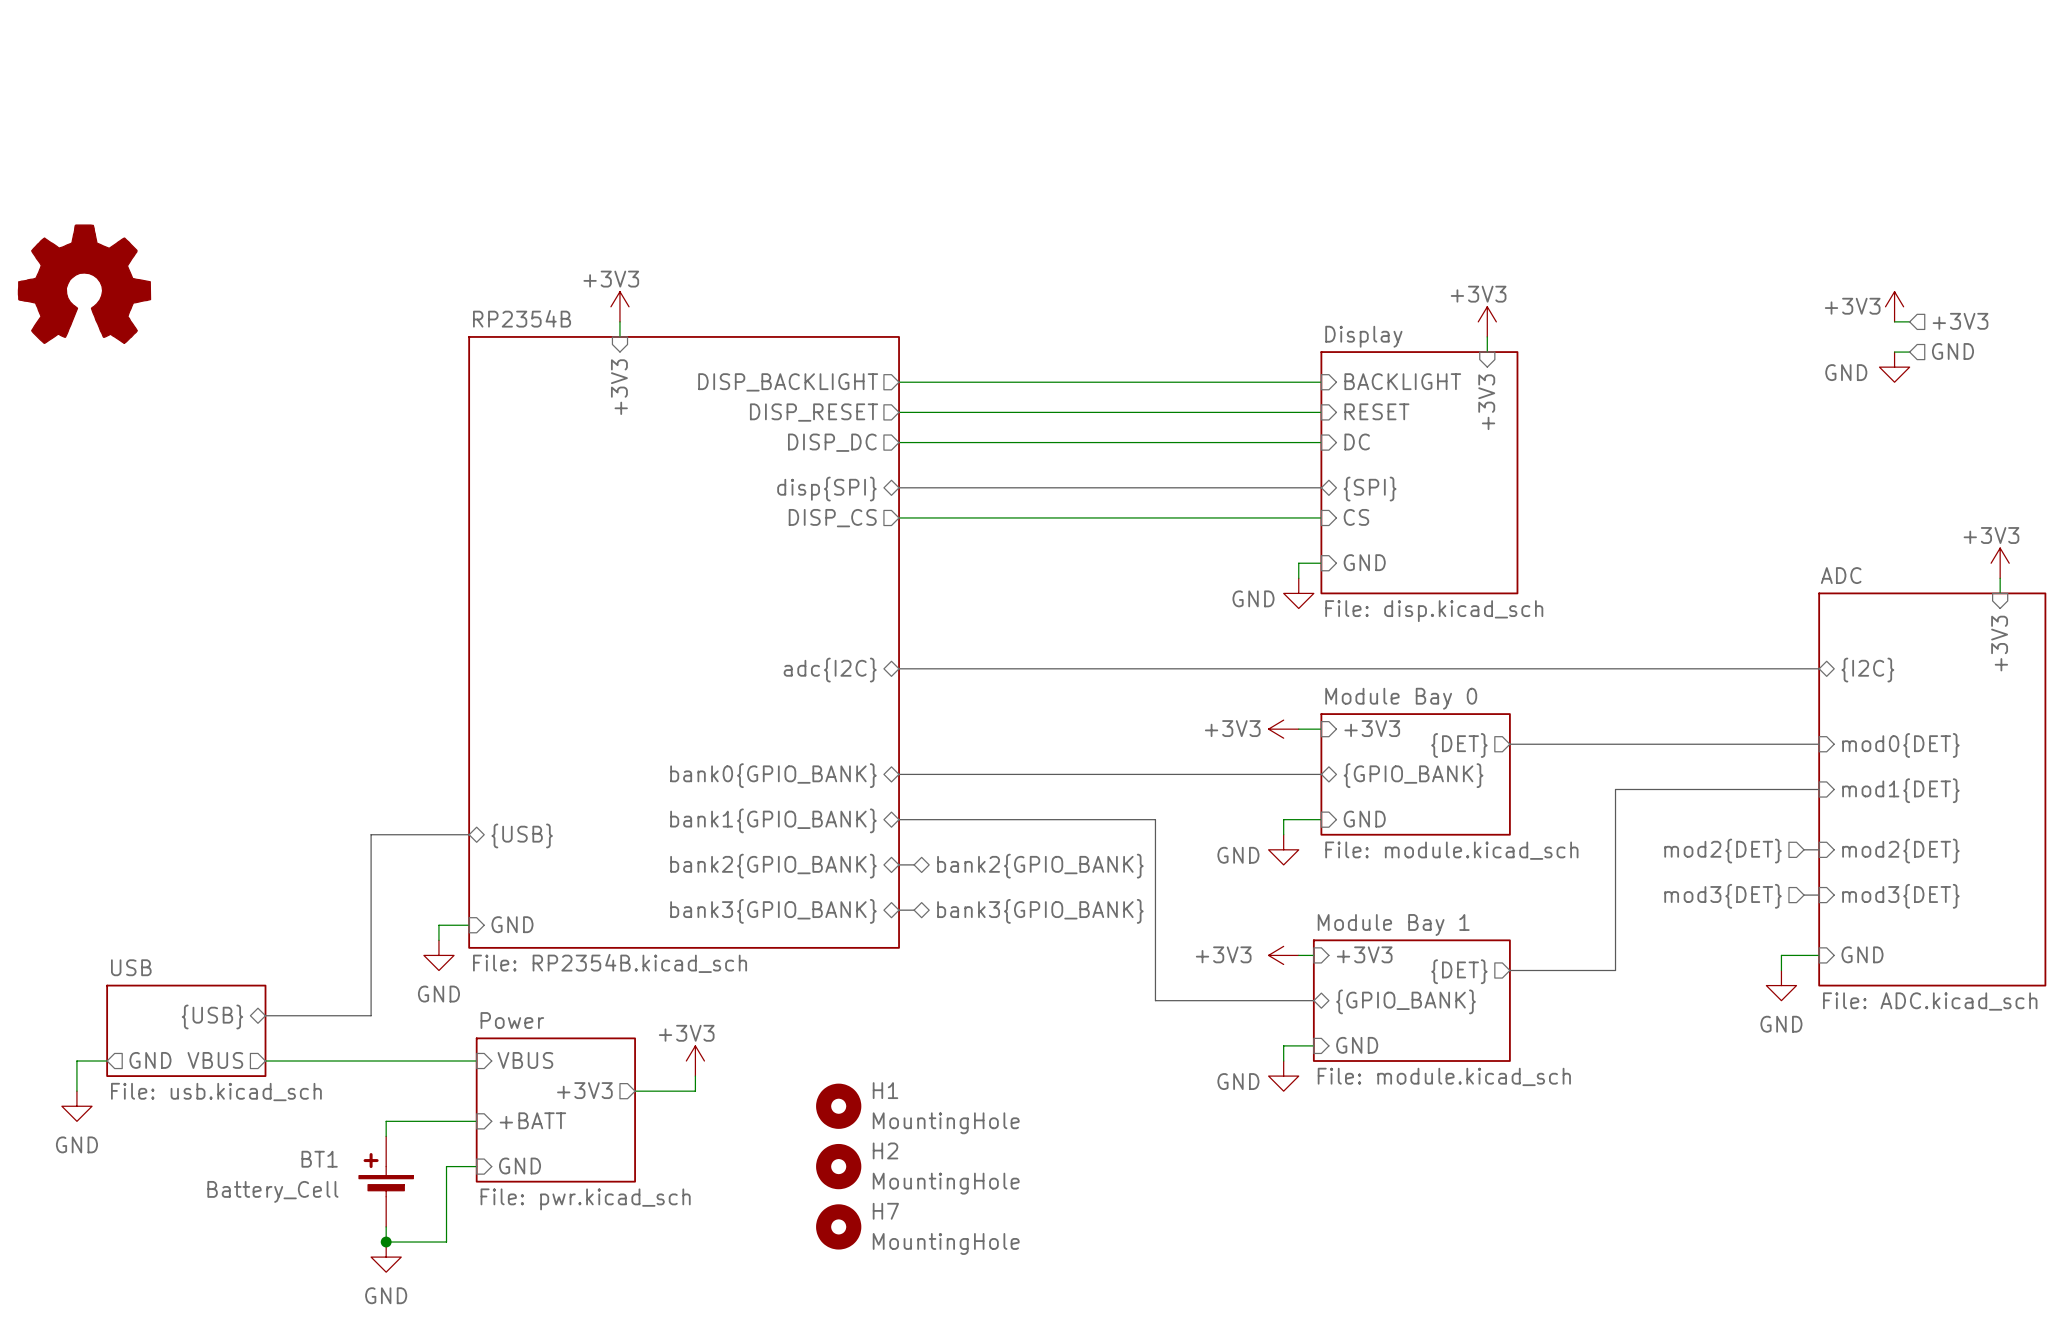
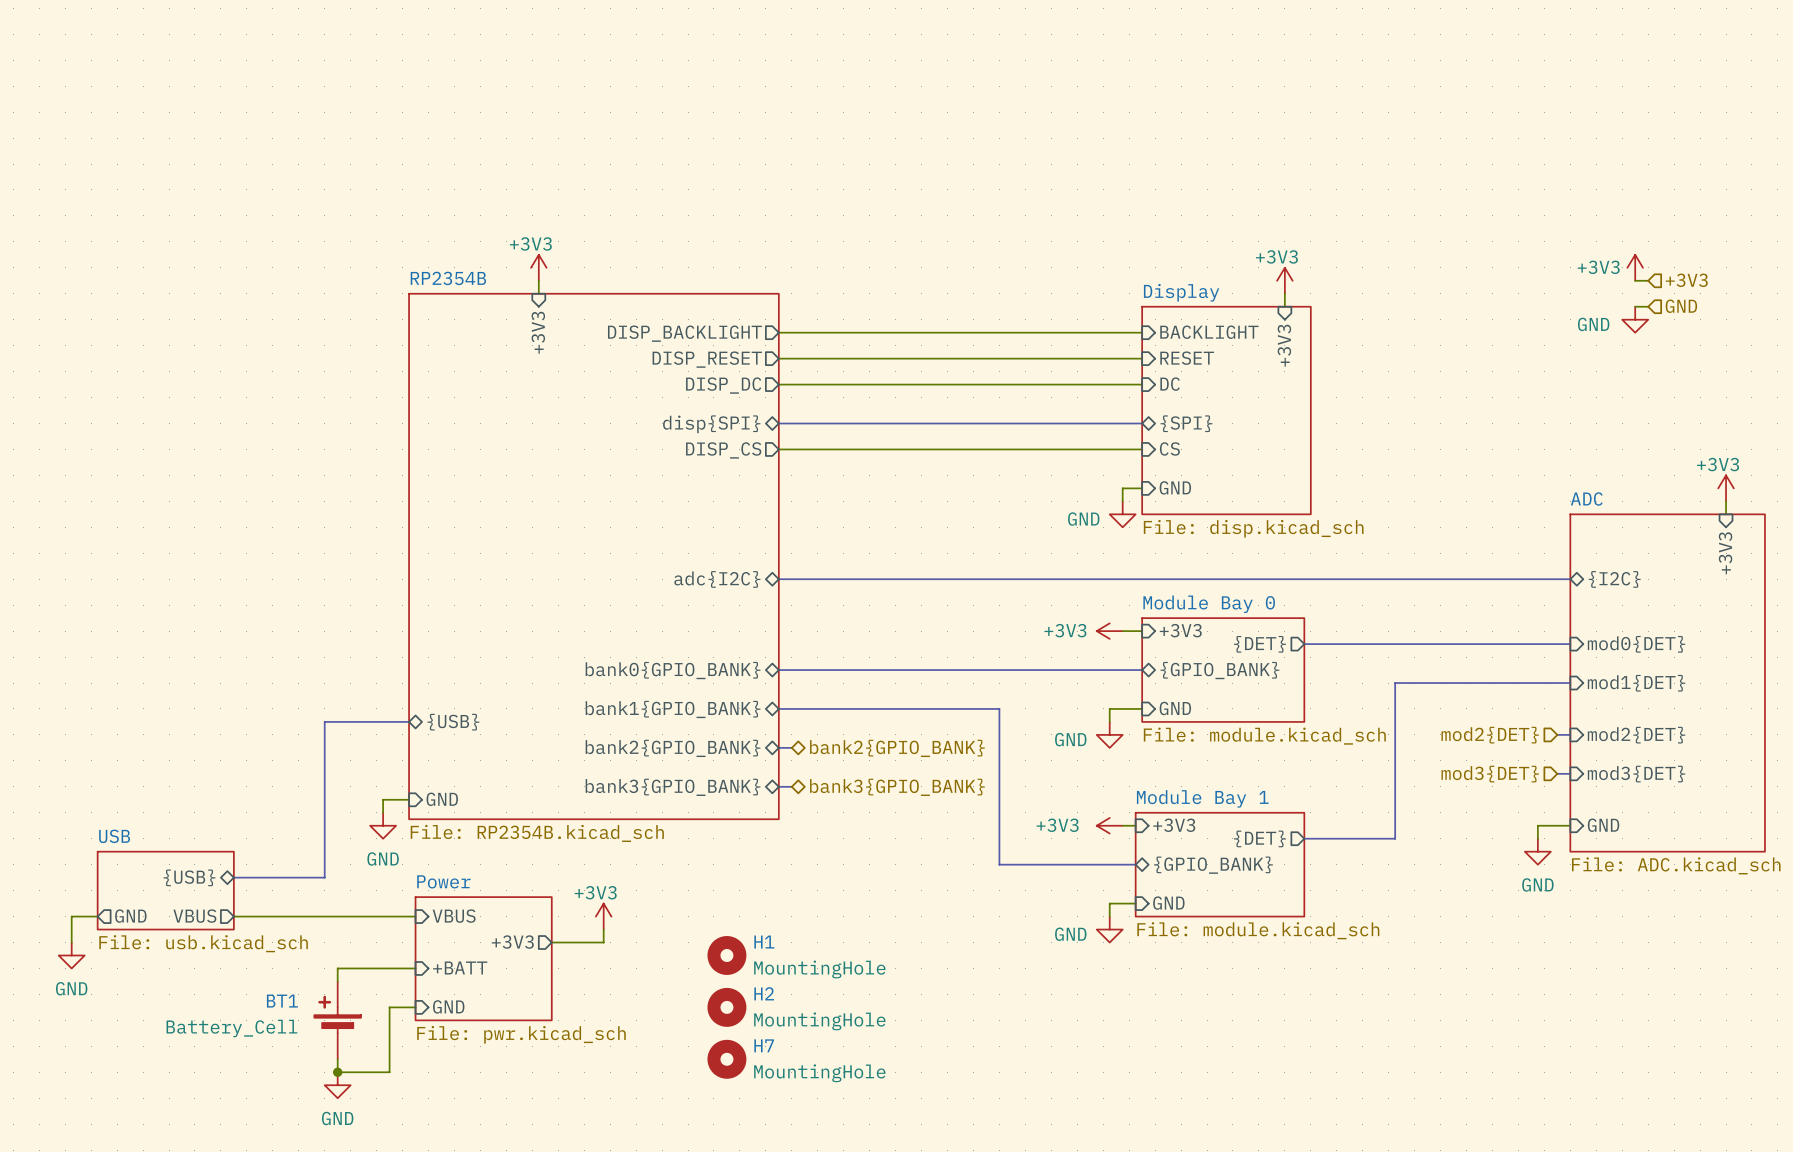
part: (84, 284) -> none

